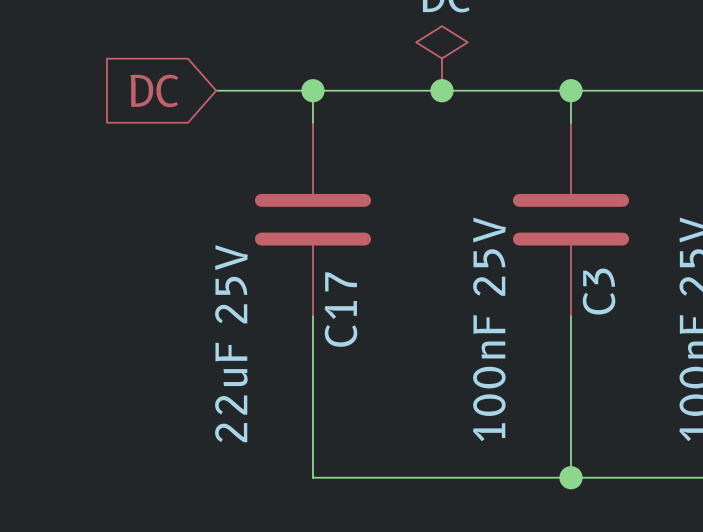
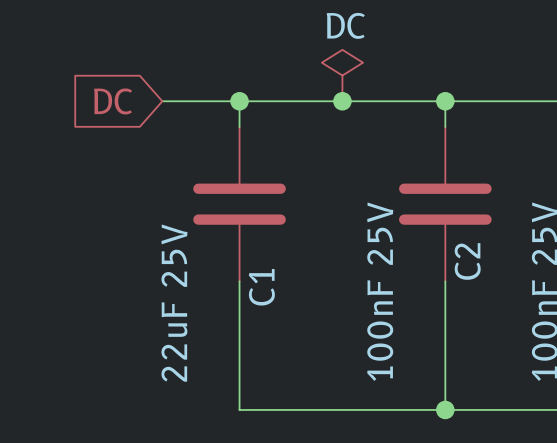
C3 name: C3 (599, 291) -> C2 (467, 261)
C17 name: C17 (341, 309) -> C1 (261, 287)

